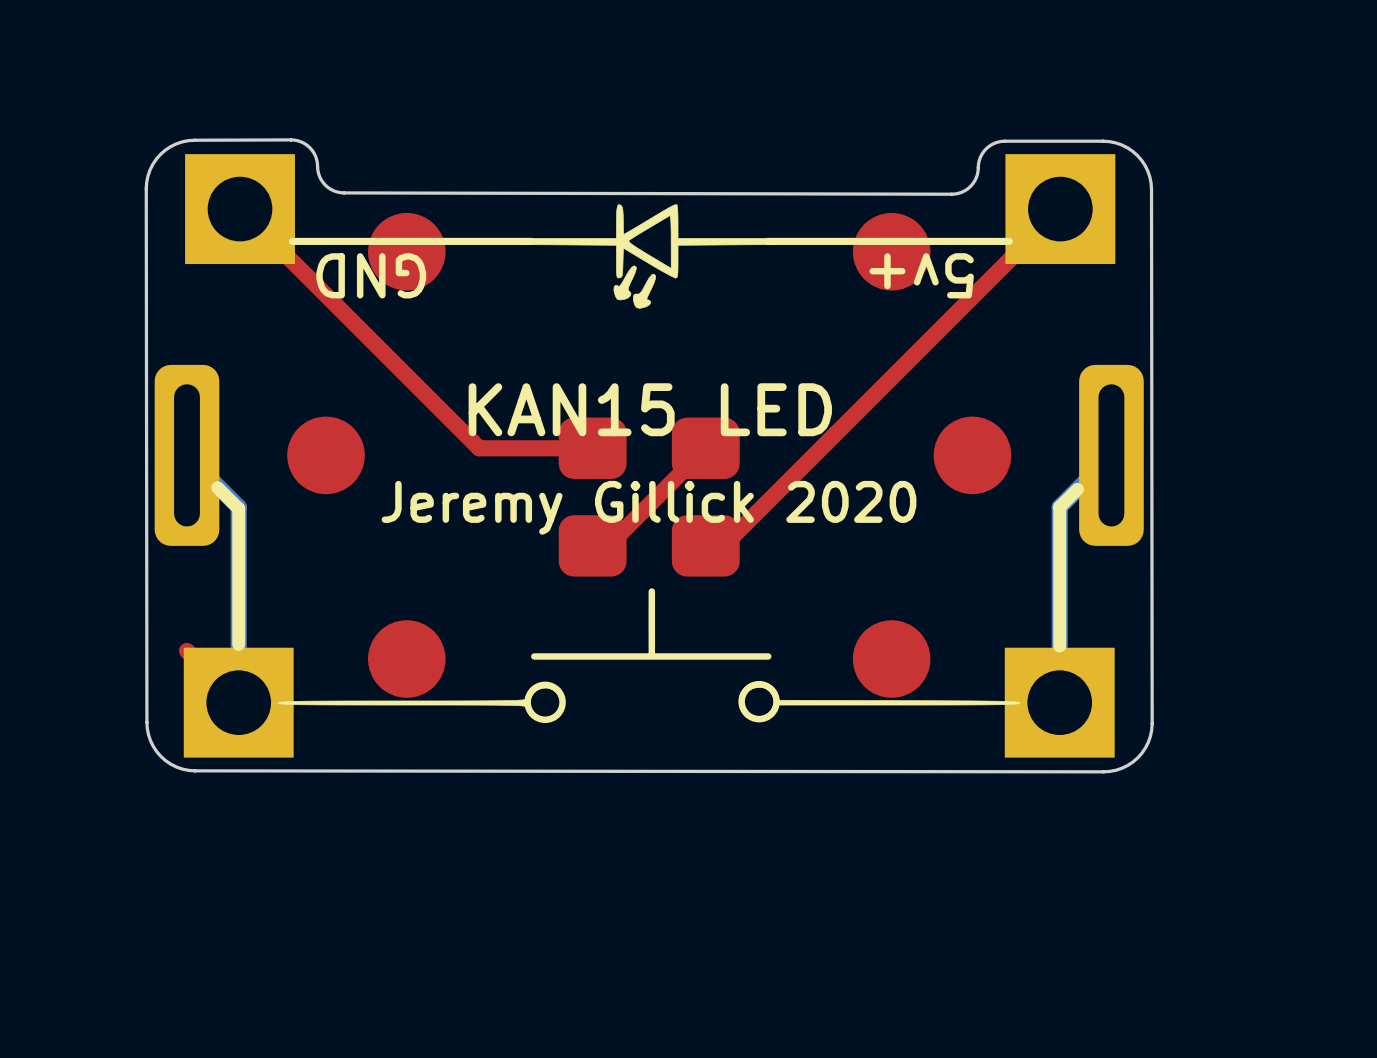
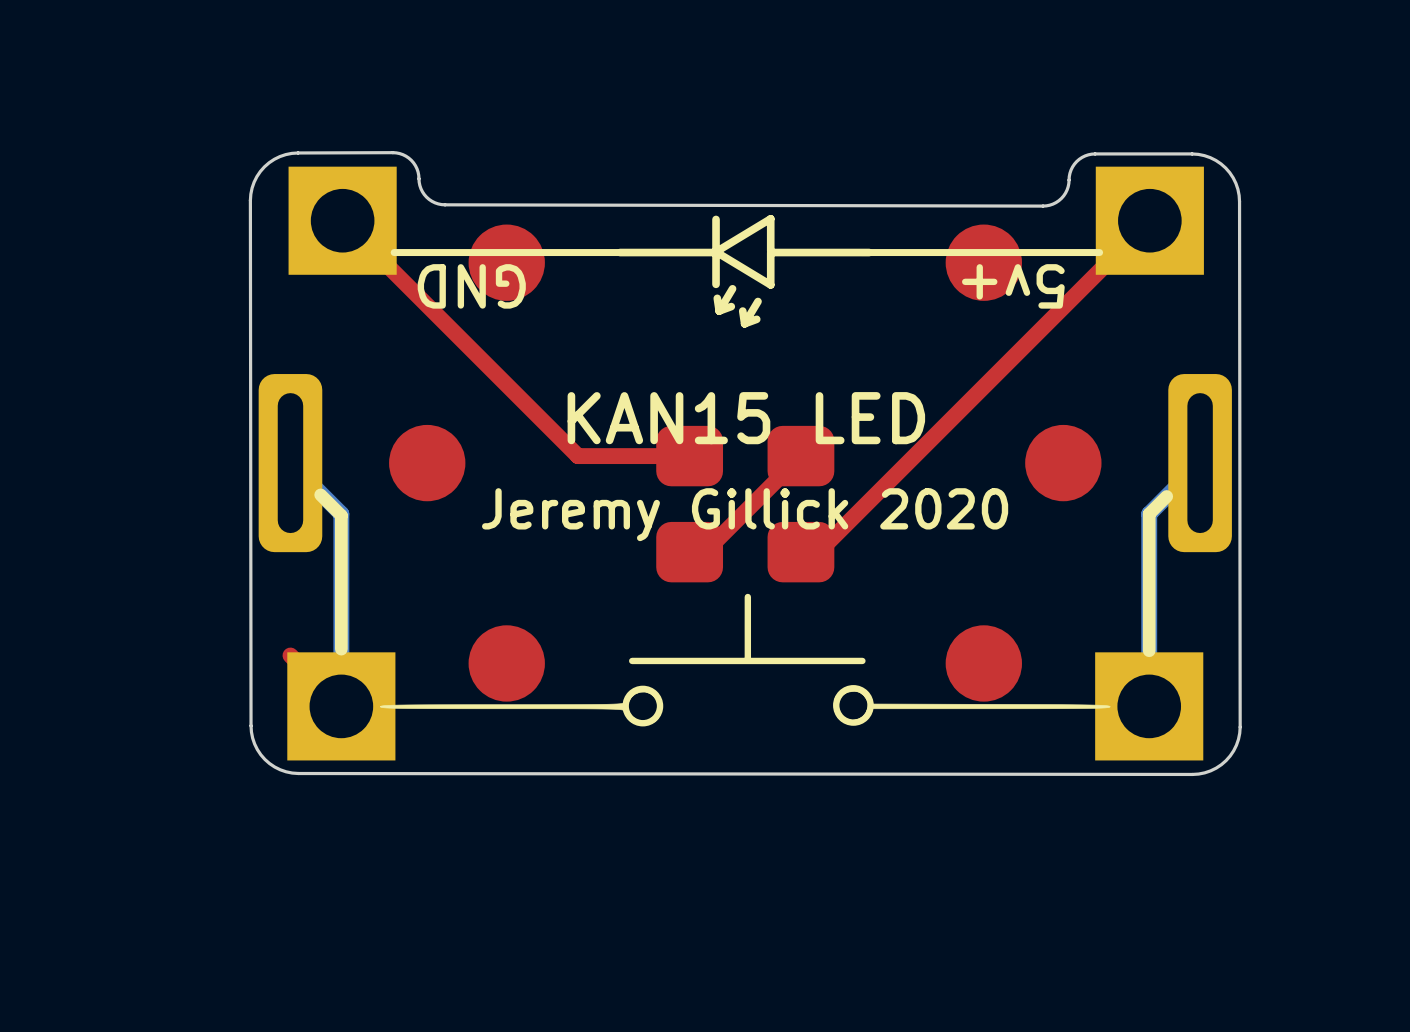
drawing shape: [518, 204, 776, 309] -> [616, 215, 874, 328]

